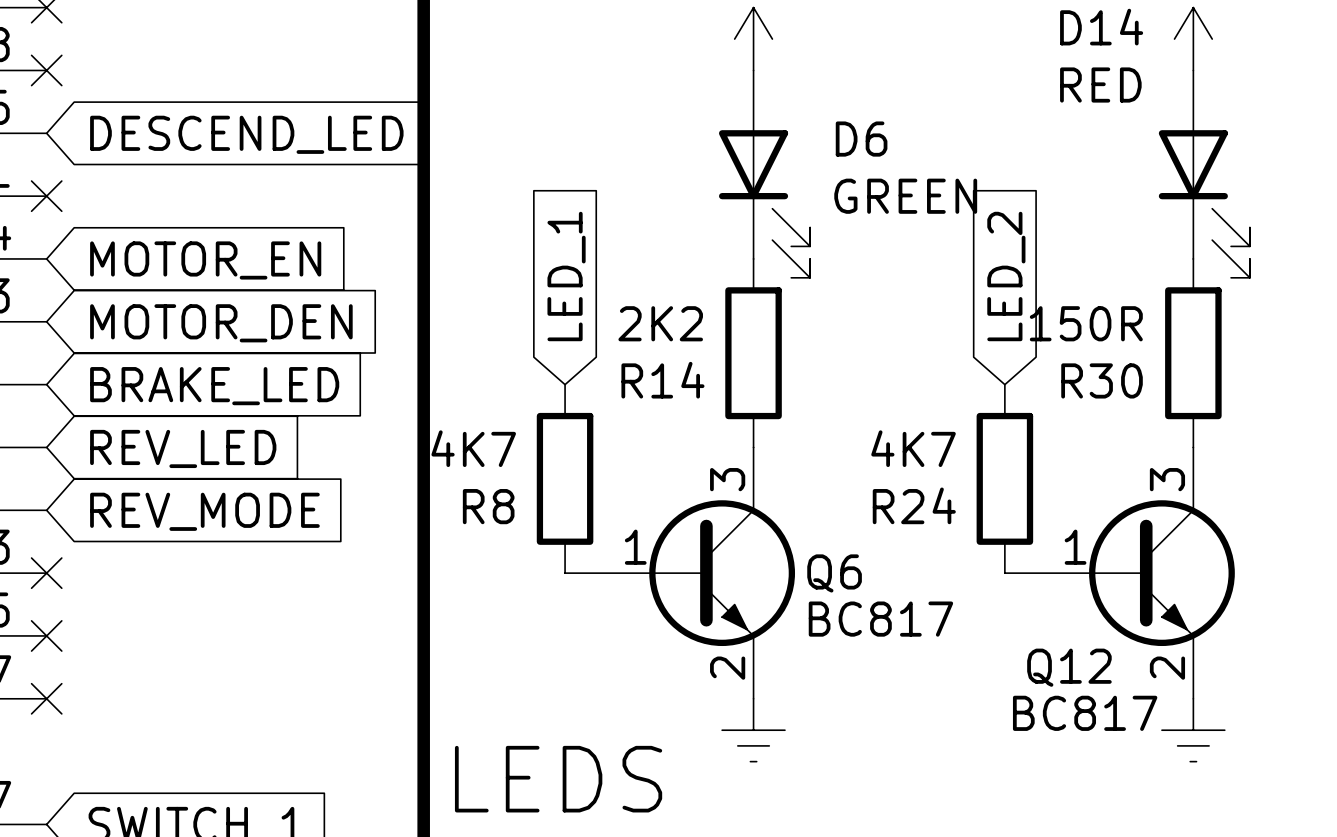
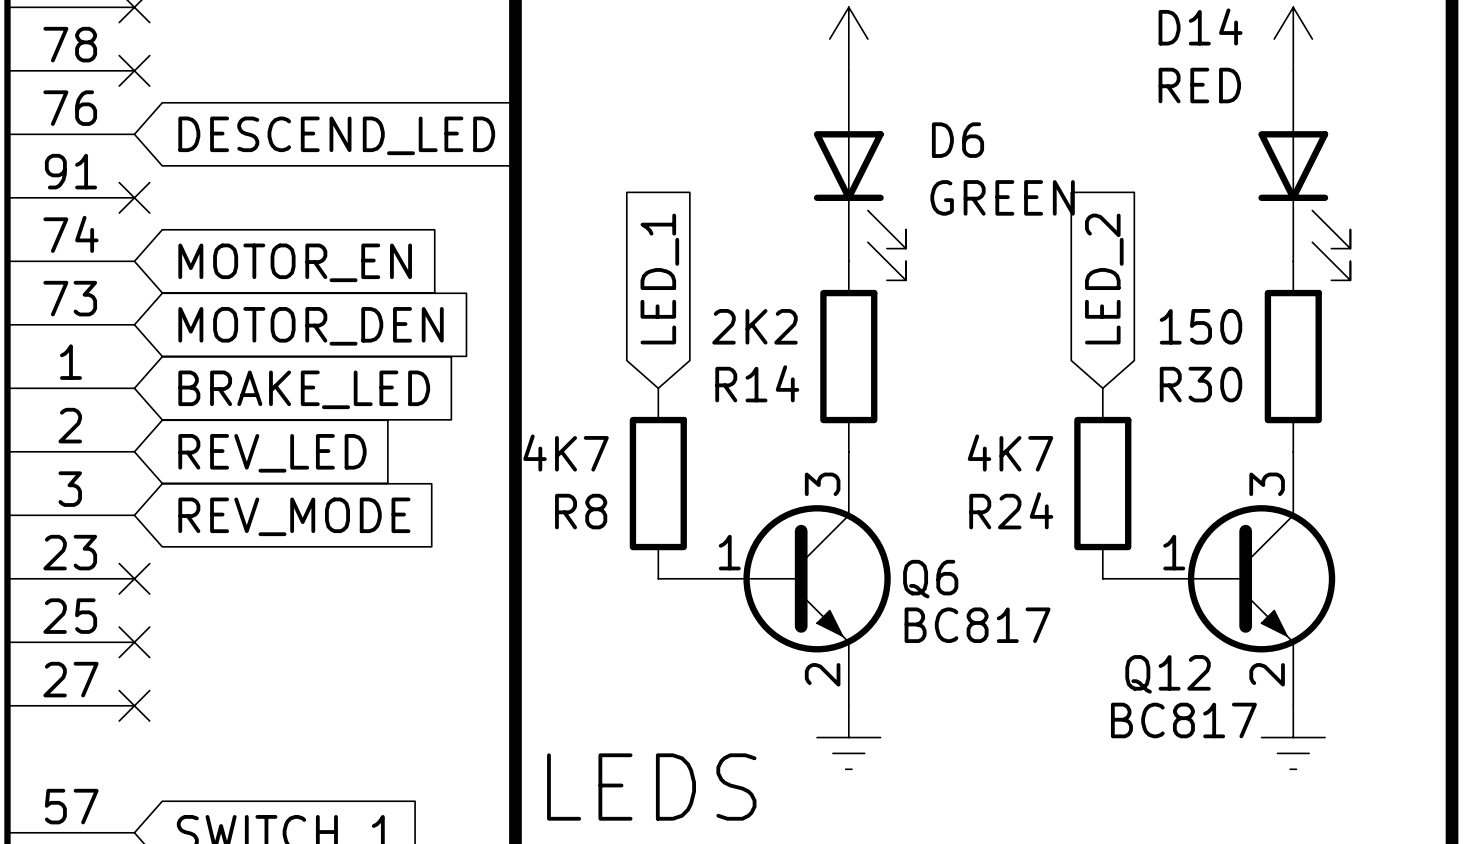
R30 value: 150R (1086, 323) -> 150 (1200, 326)

